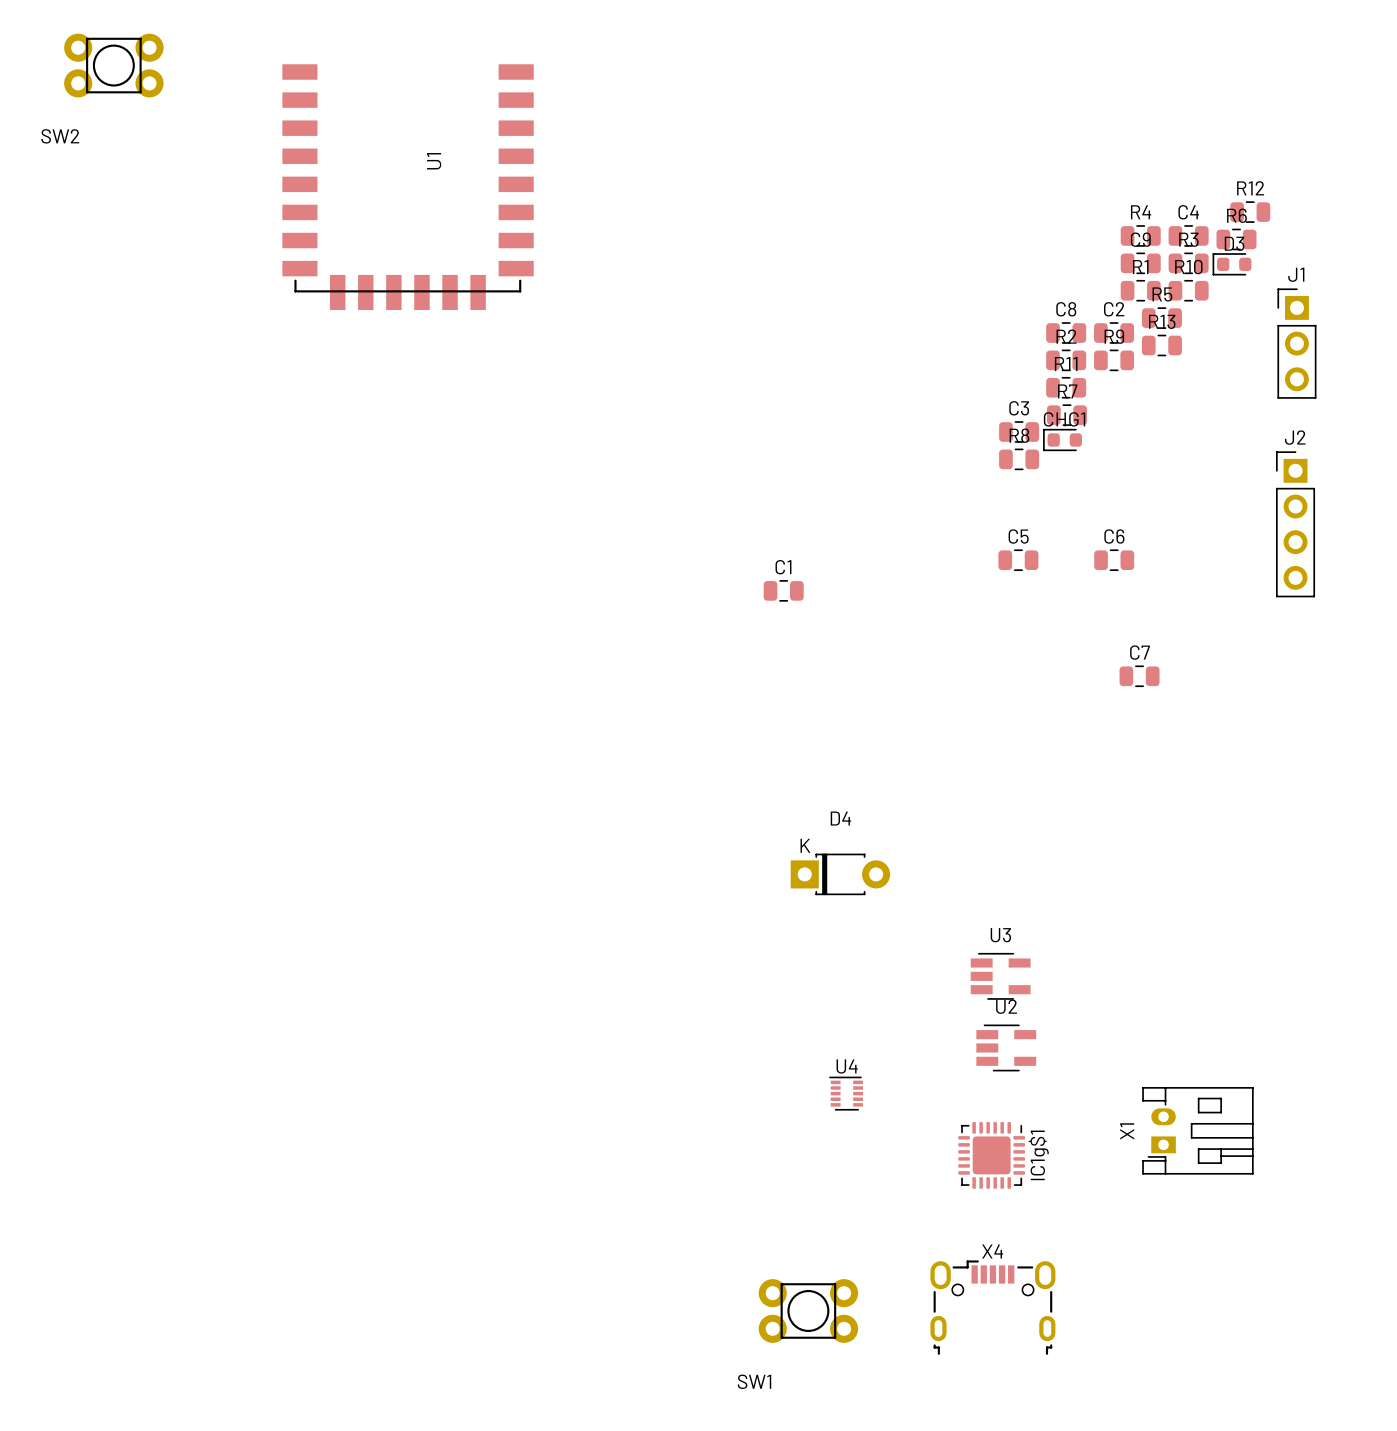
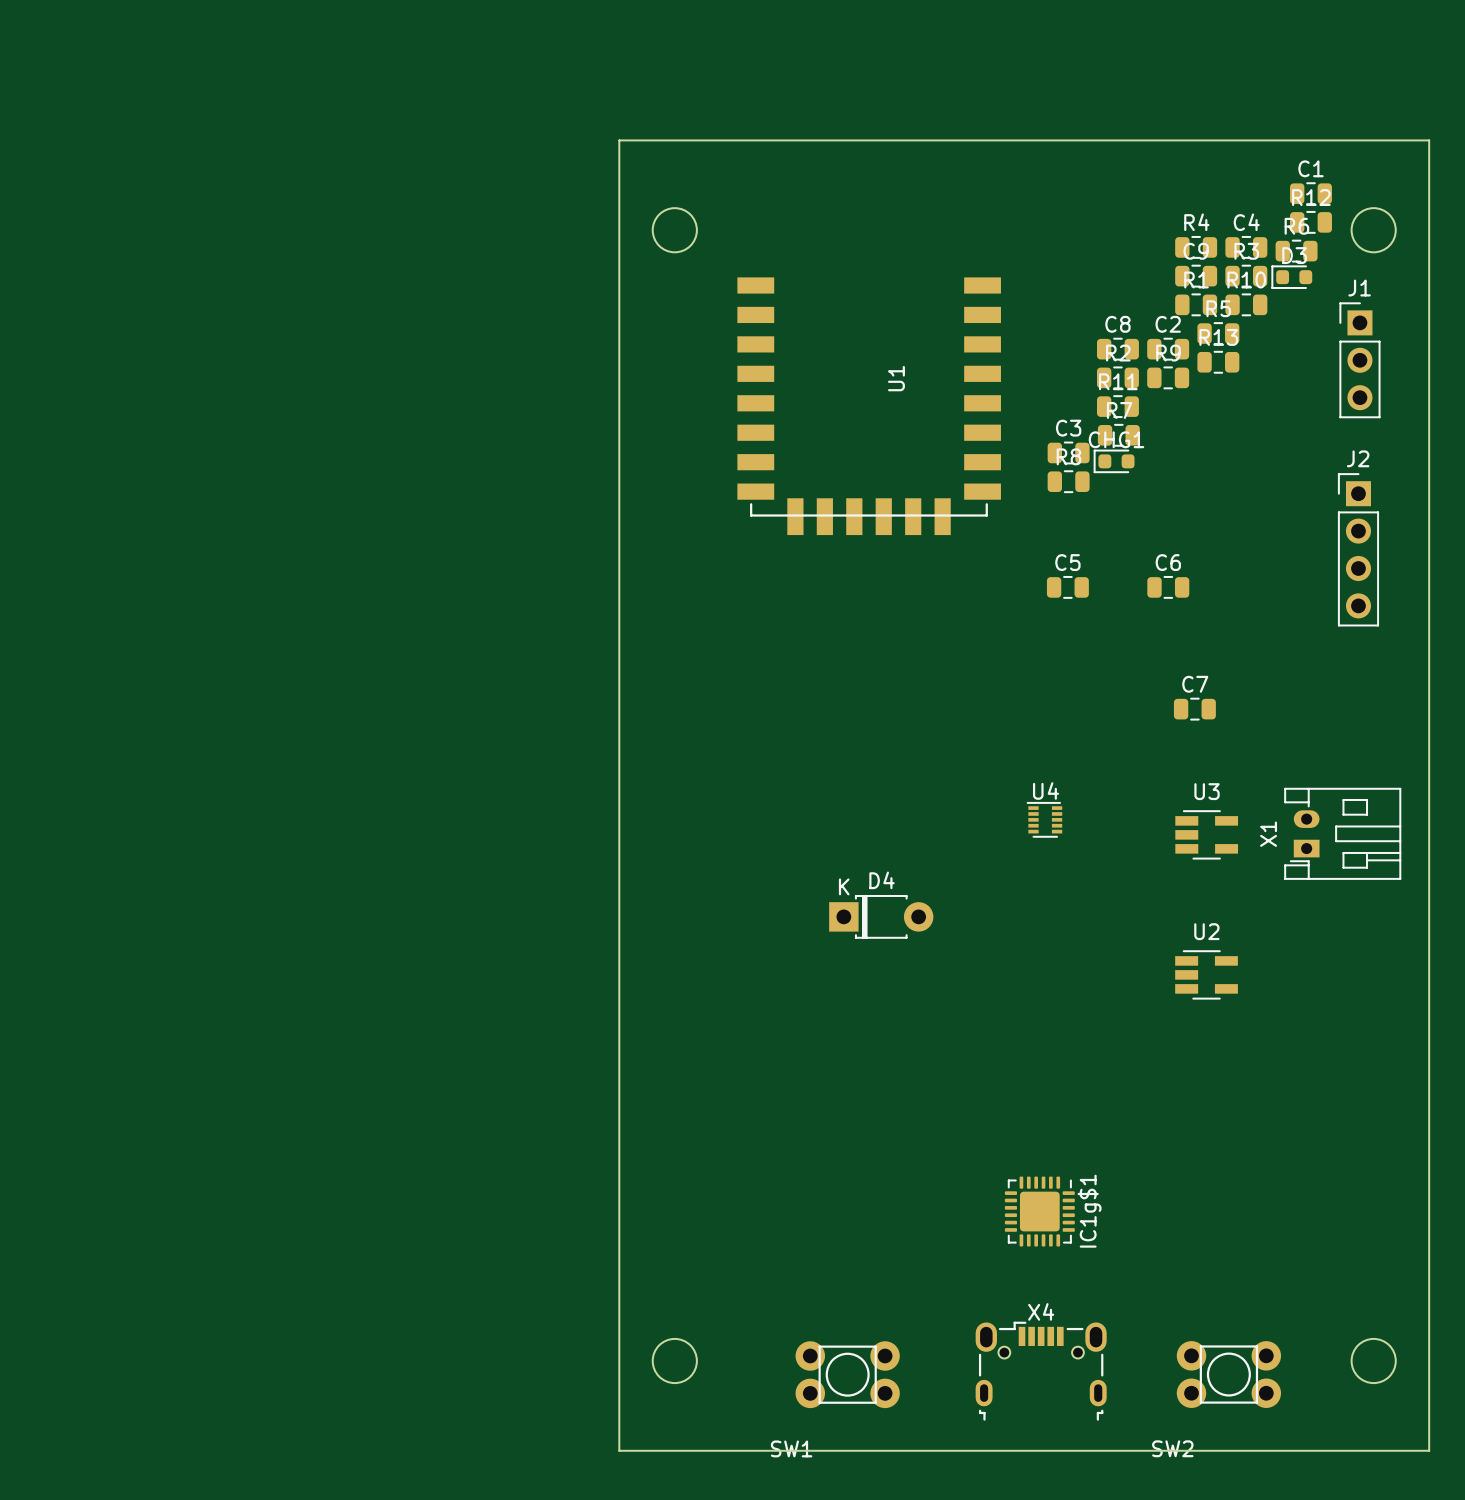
SW2 position: (113, 65) -> (1228, 1374)
board edge: none -> (619, 140) (619, 1450) (1429, 1450) (1429, 140) (619, 140)
U1 position: (408, 187) -> (869, 406)
round board edge: none -> [651, 207, 698, 254]
round board edge: none -> [1350, 207, 1397, 254]
C1 position: (783, 590) -> (1311, 193)
D4 name position: D4 (840, 818) -> D4 (881, 880)
U3 position: (1000, 976) -> (1206, 834)
U2 position: (1006, 1047) -> (1206, 974)
U4 position: (846, 1093) -> (1044, 819)
X1 position: (1197, 1130) -> (1342, 833)
round board edge: none -> [651, 1338, 698, 1384]
round board edge: none -> [1350, 1338, 1397, 1384]

